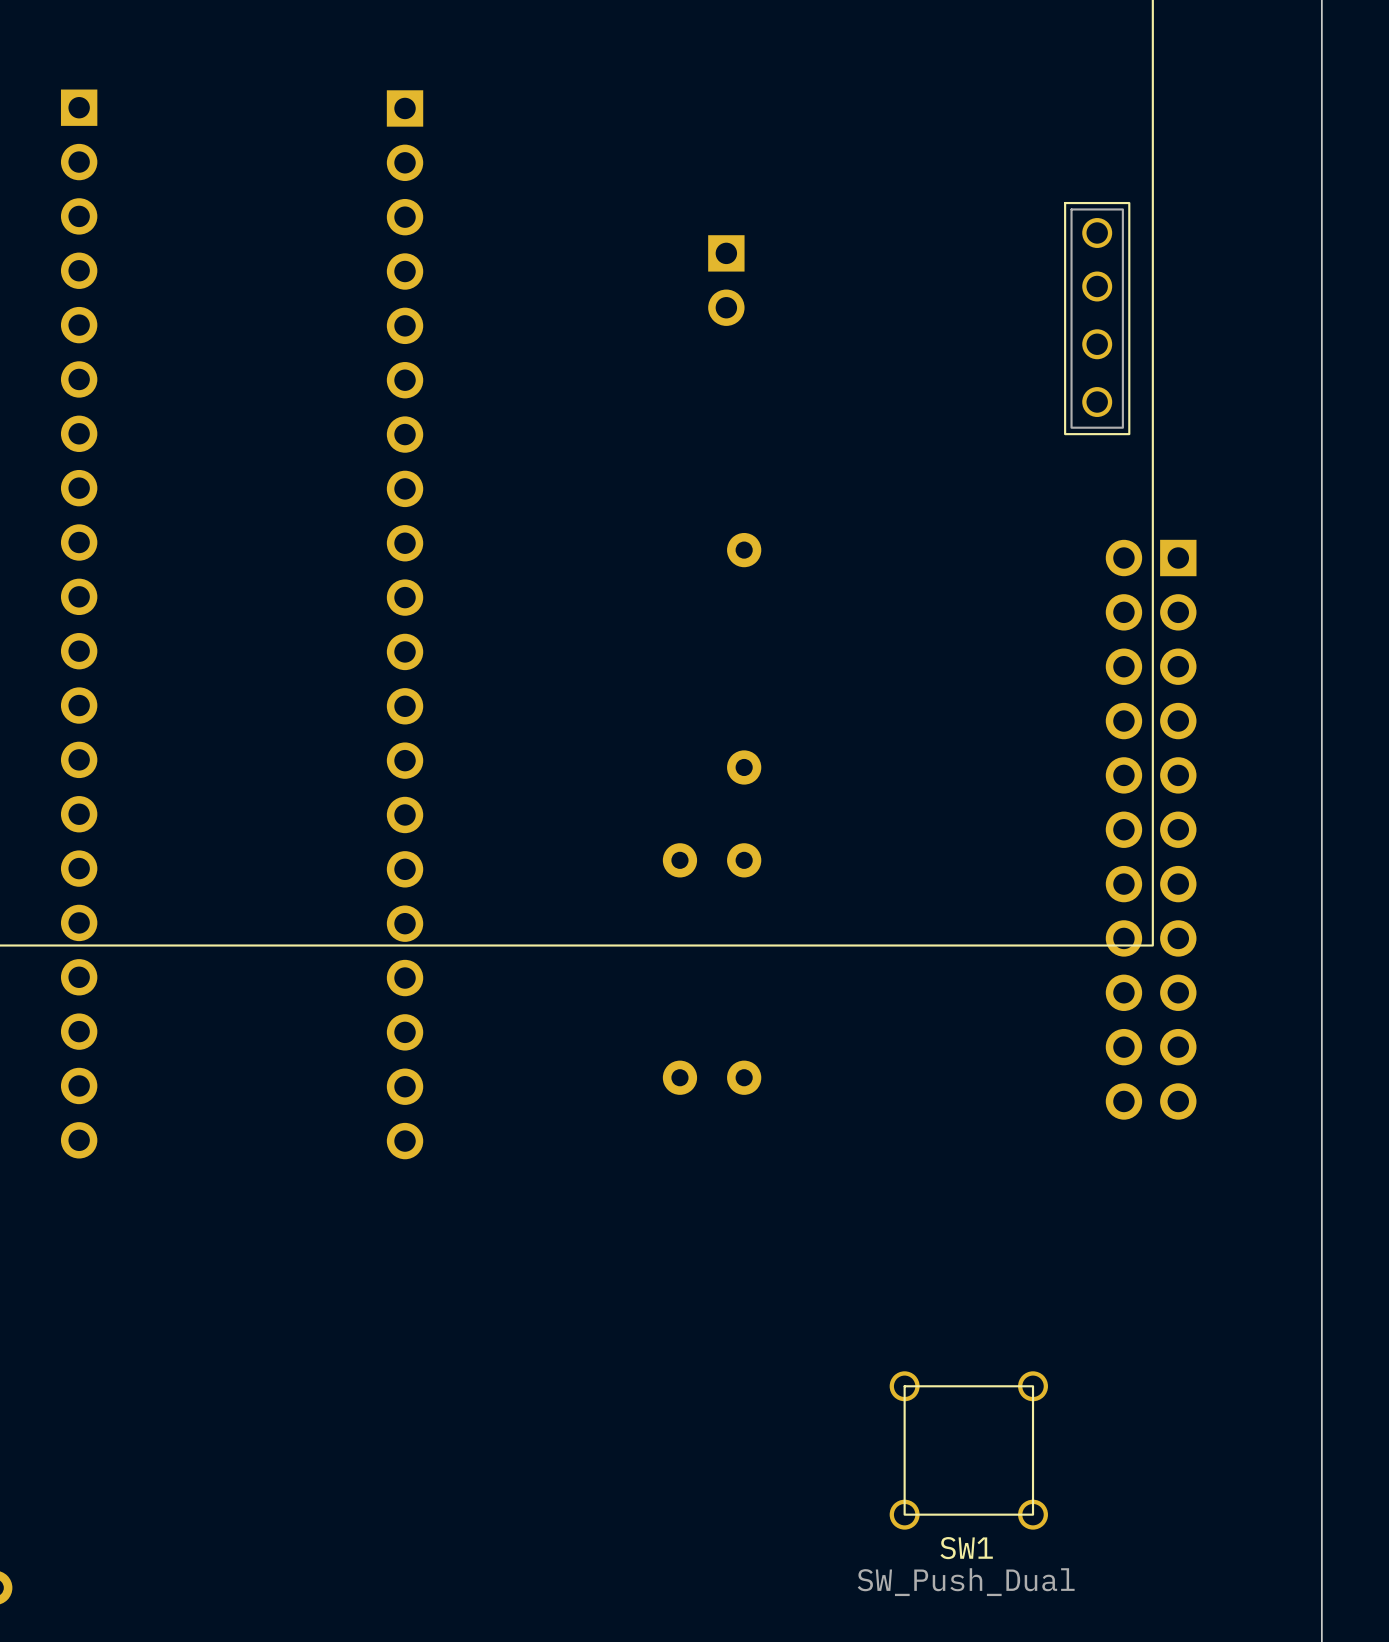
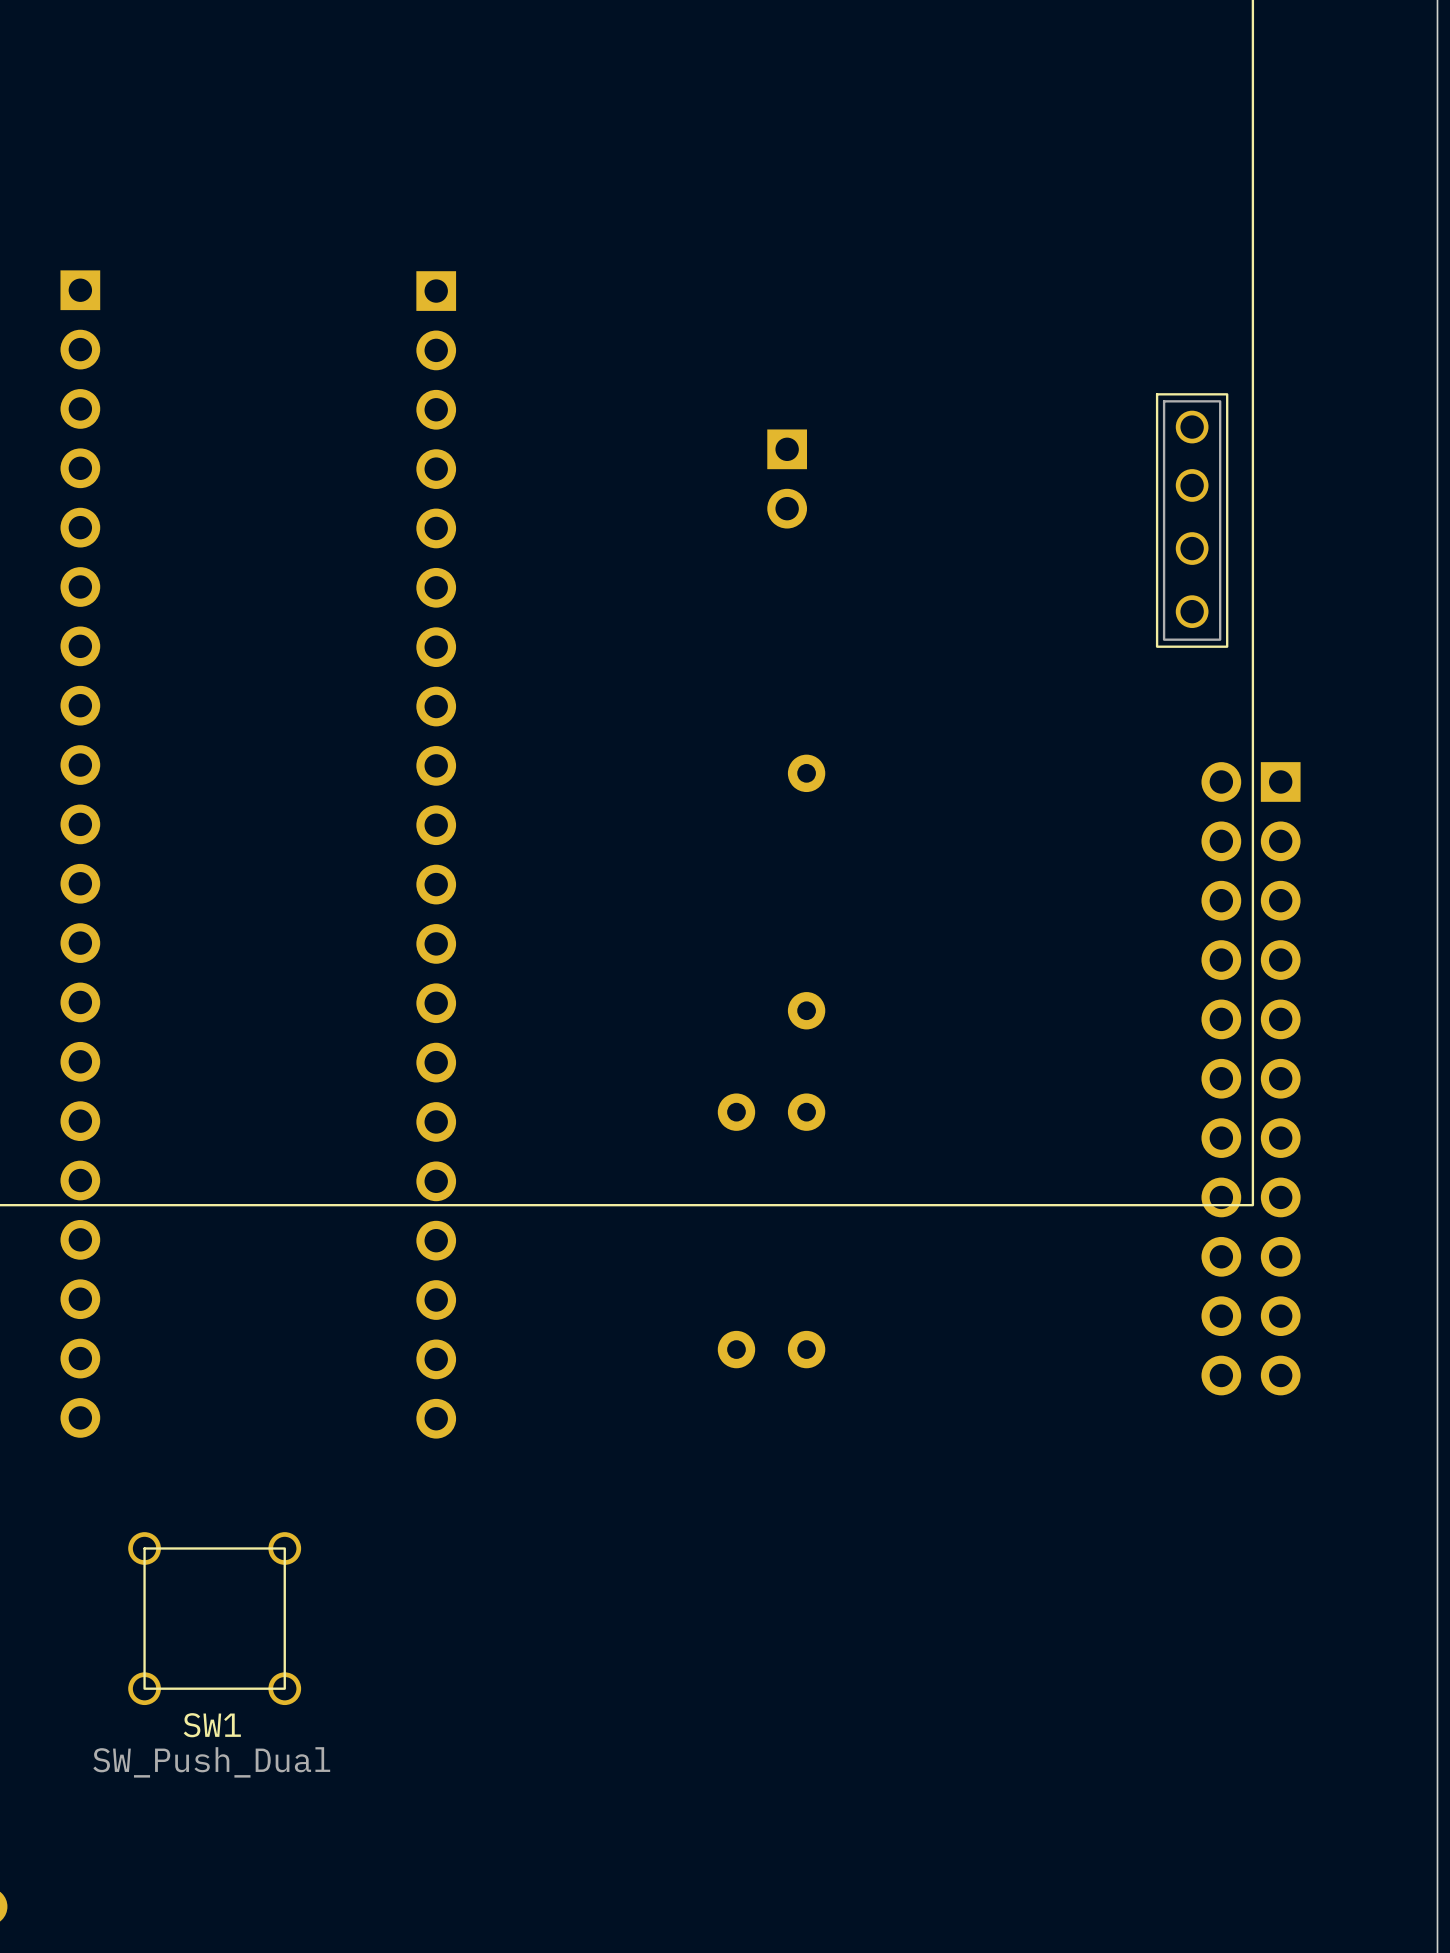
SW1 position: (968, 1450) -> (214, 1618)

